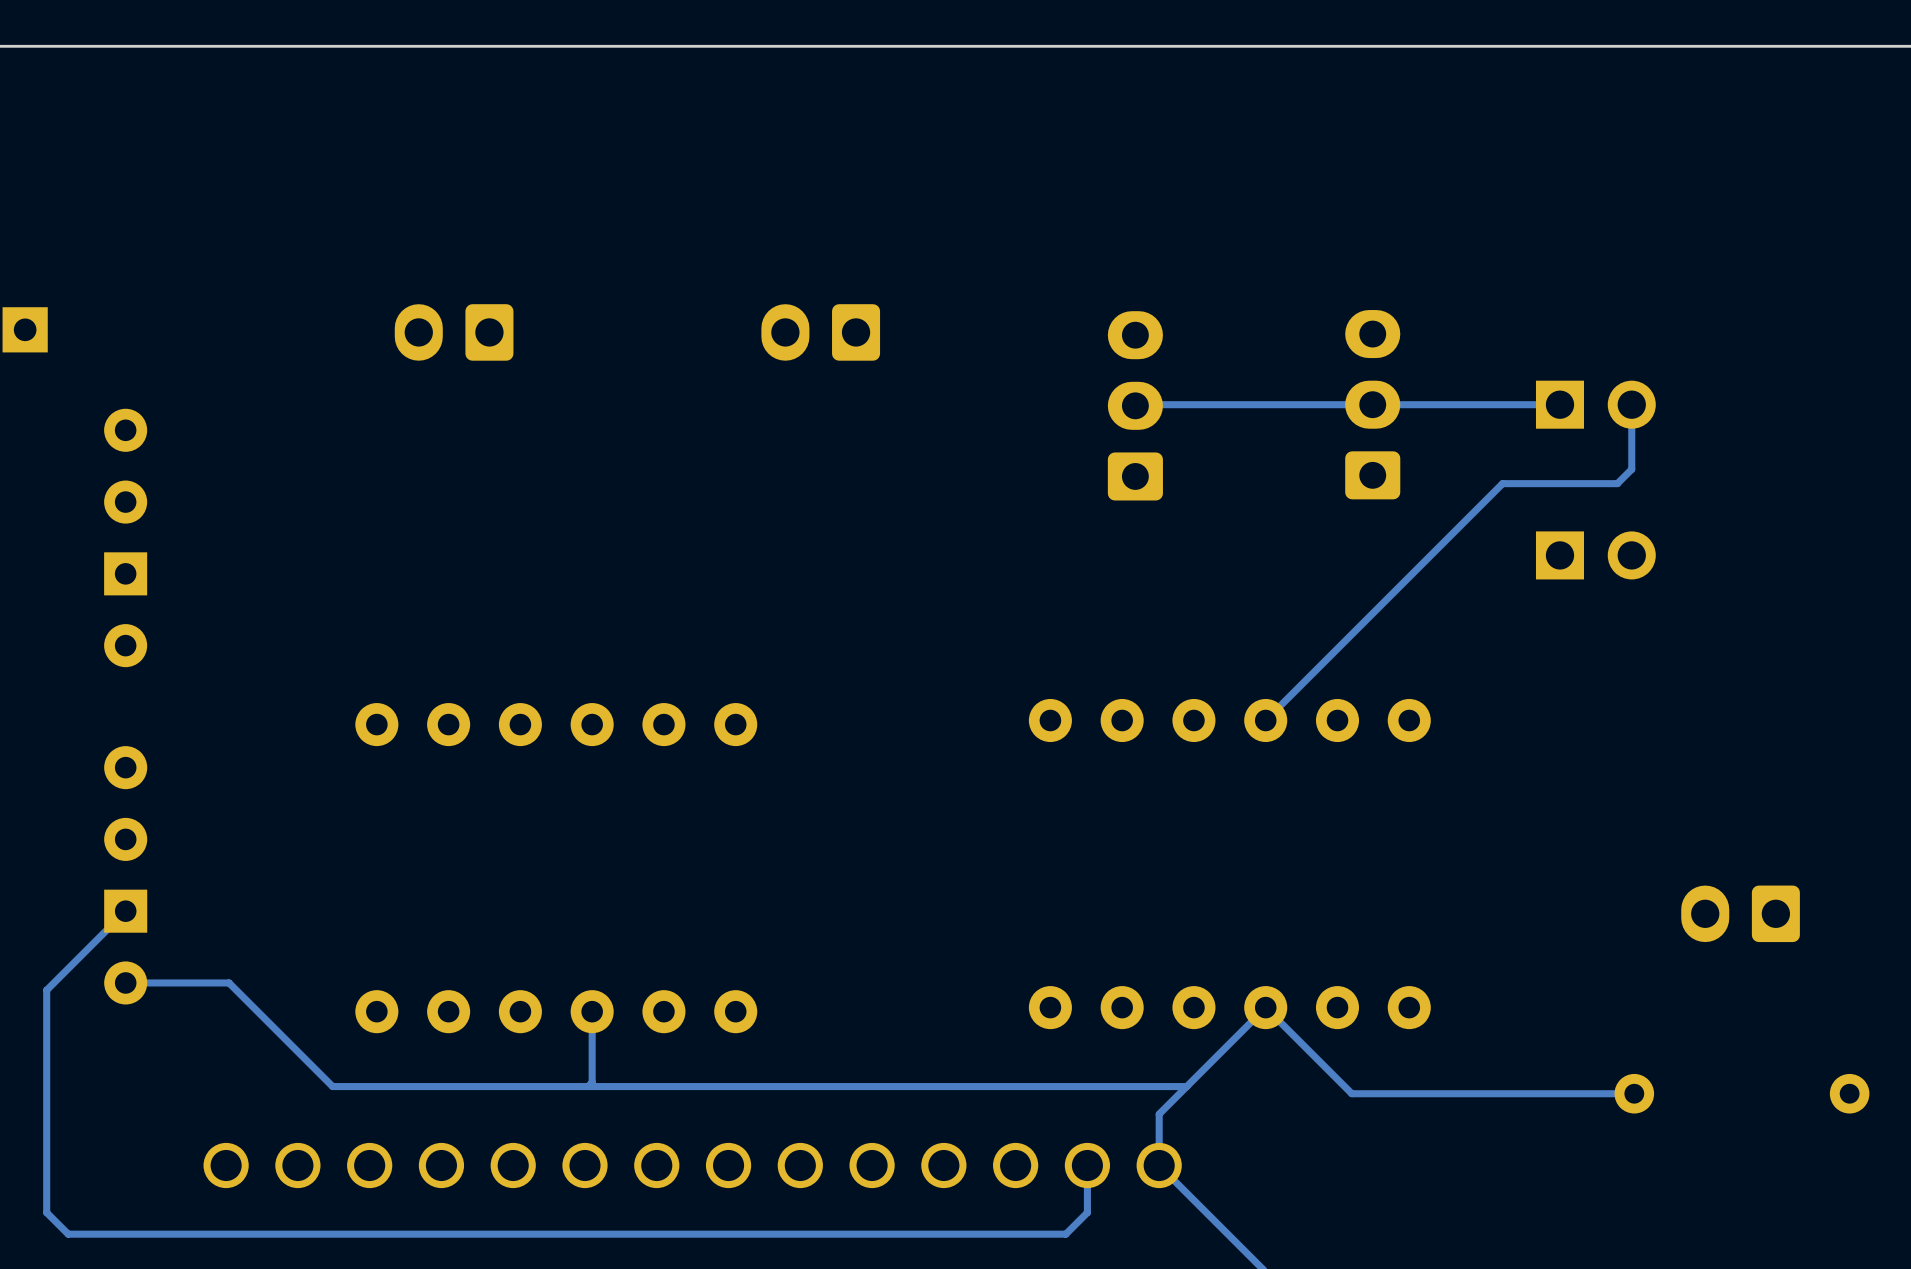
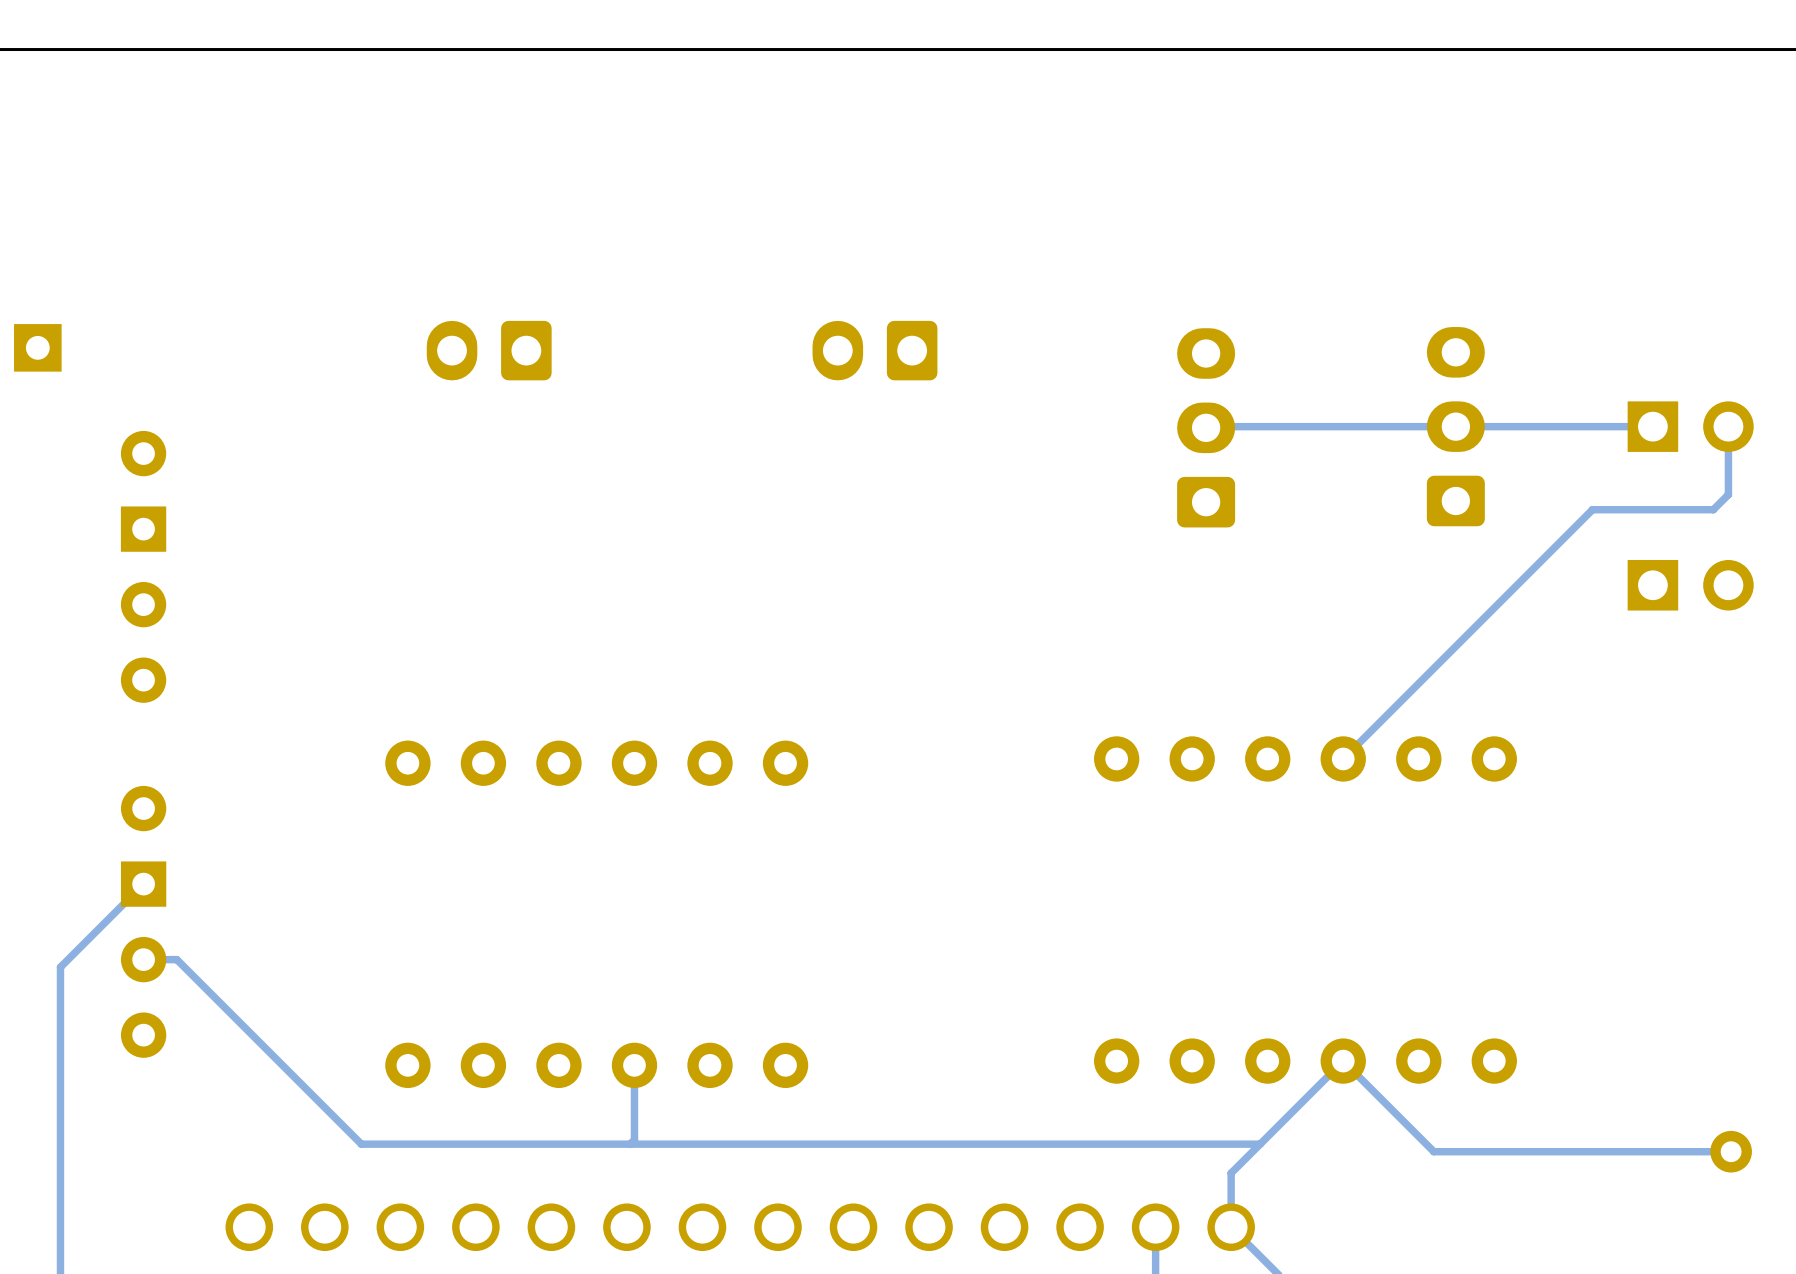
part rotation: 0° (125, 537) -> 180° (143, 566)
part rotation: 0° (125, 875) -> 180° (143, 921)
track: (125, 911) (46, 990) -> (143, 884) (60, 967) (60, 1042)
track: (229, 982) (125, 982) -> (252, 1035) (176, 959) (143, 959)

